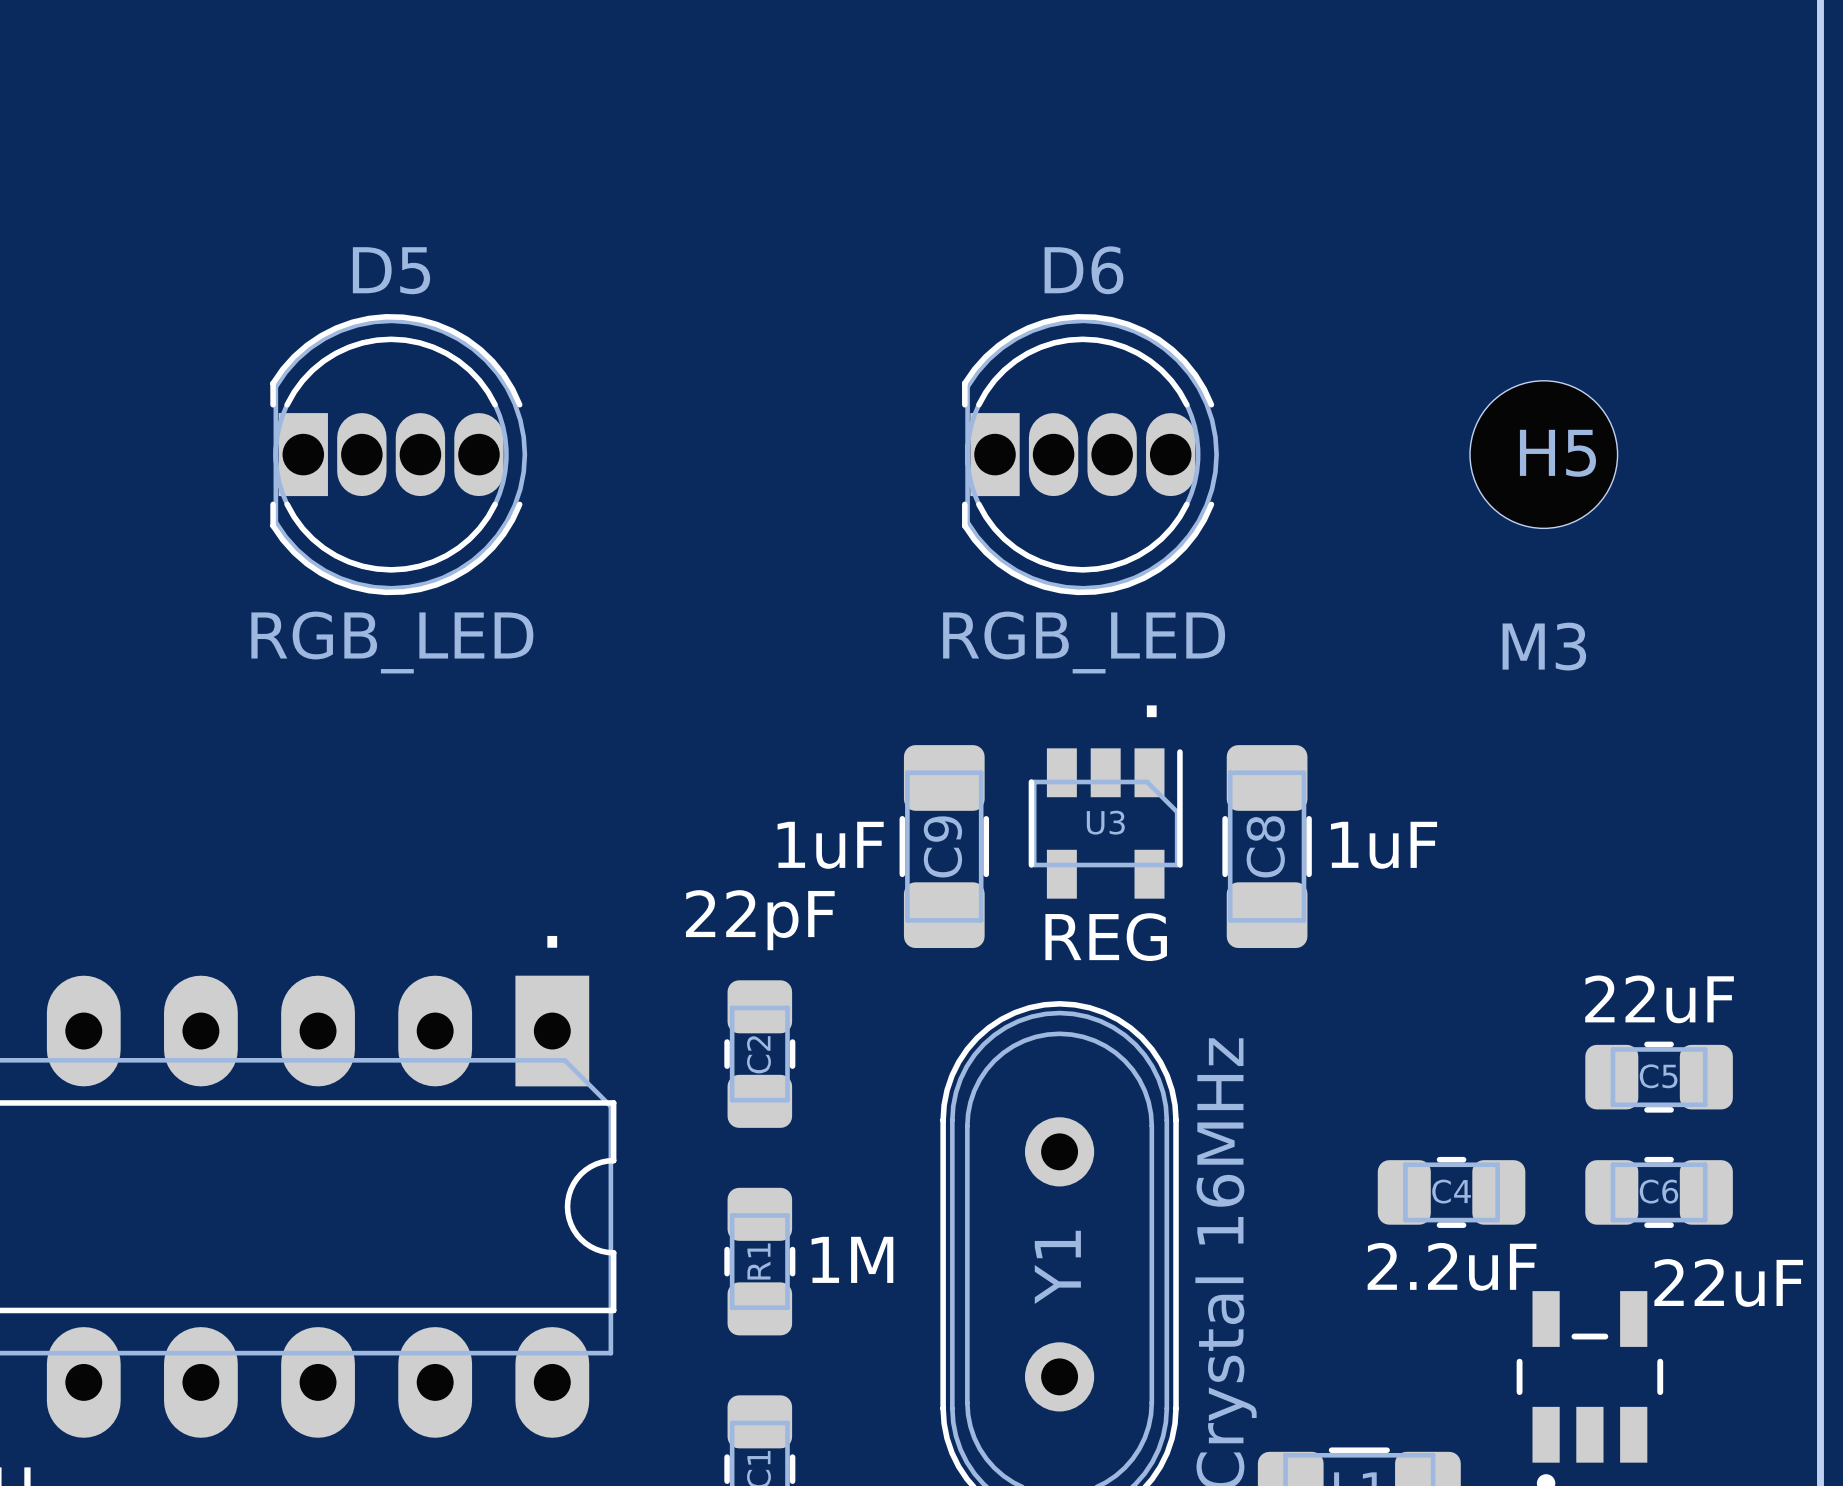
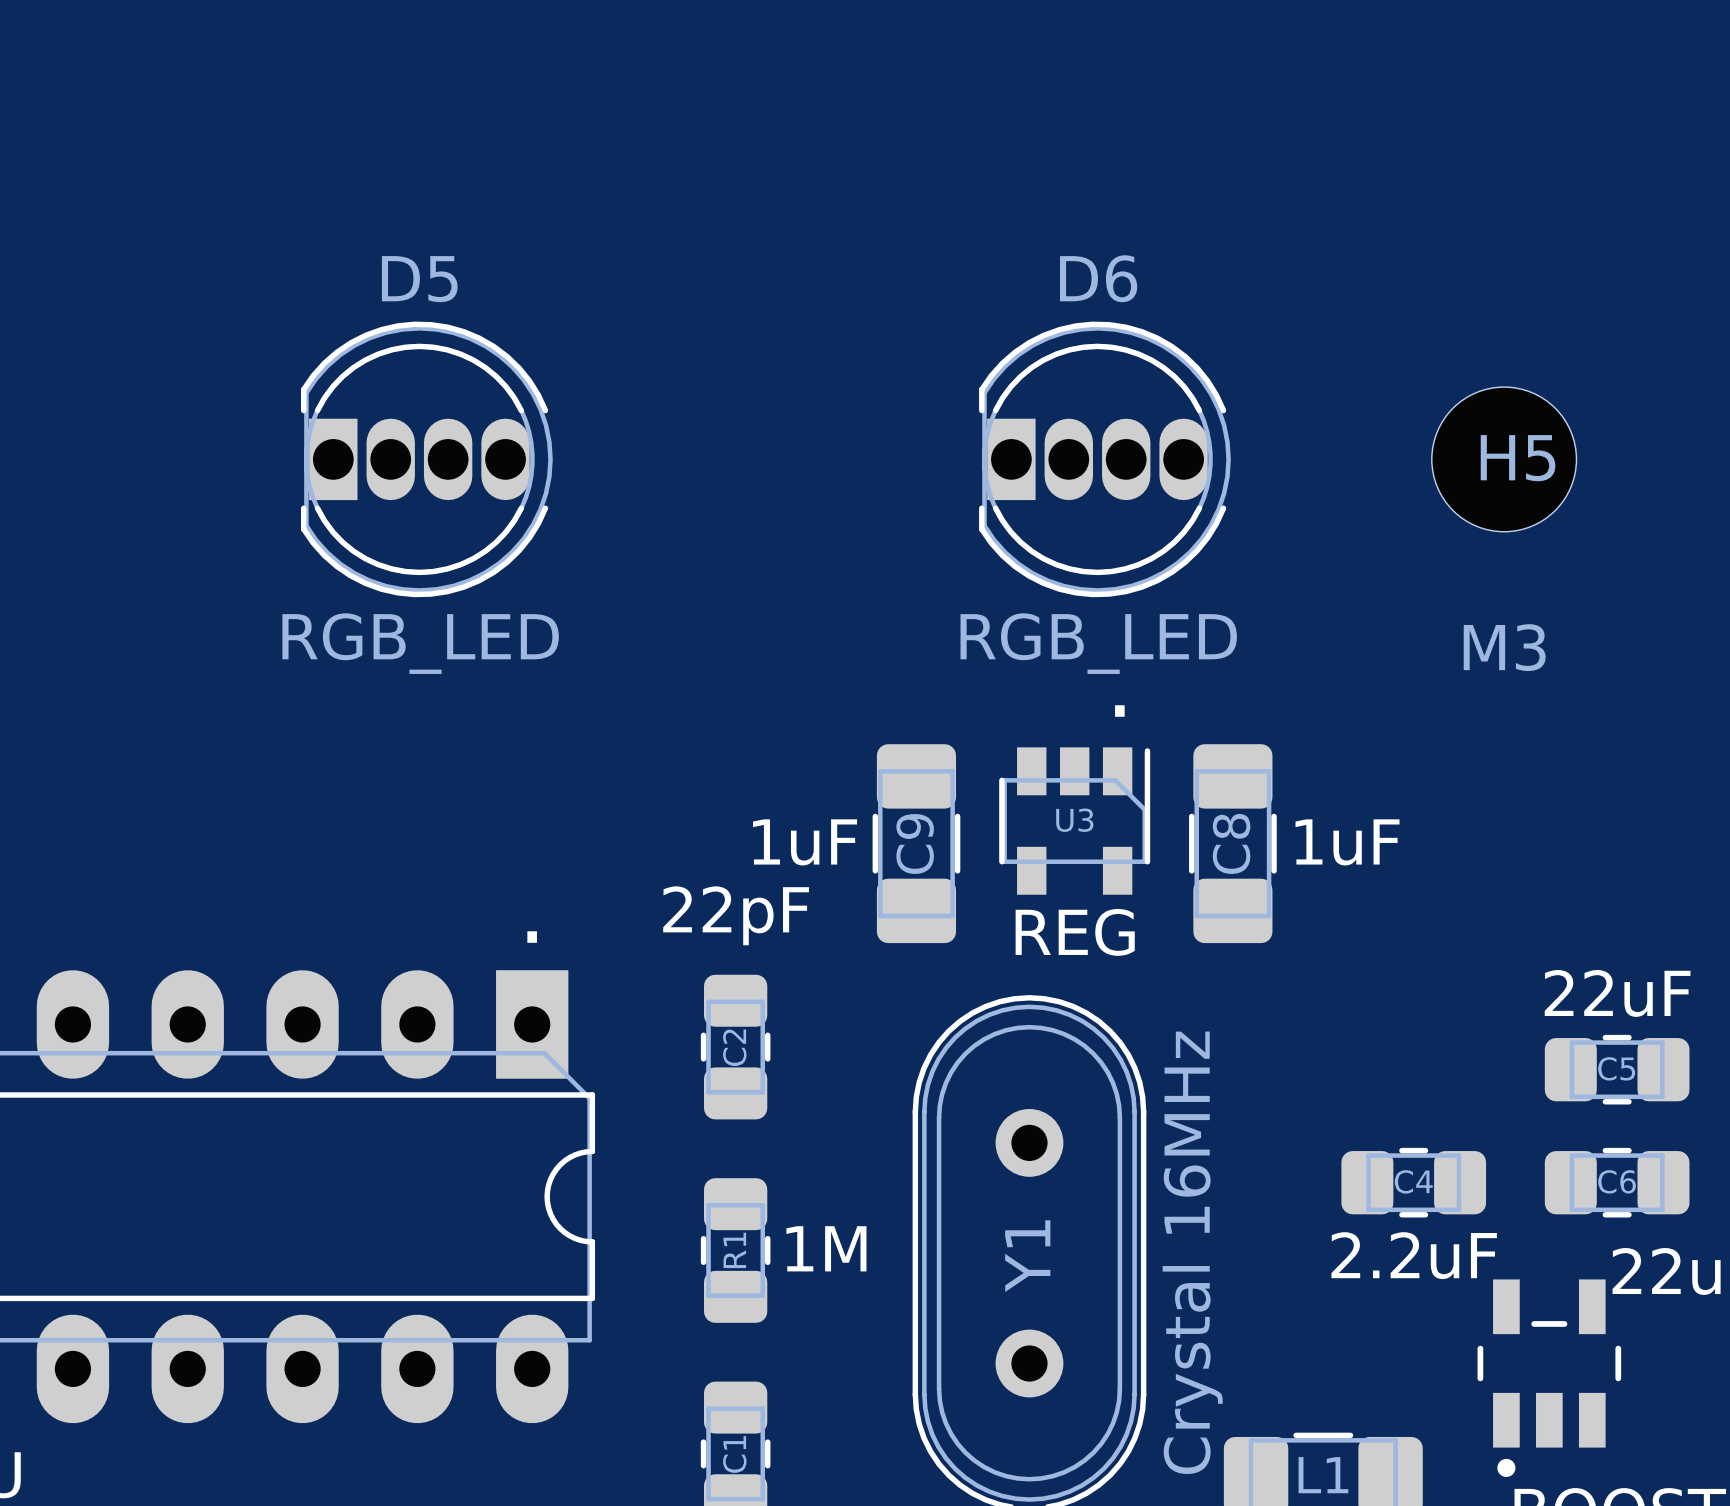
D5 position: (398, 454) -> (426, 459)
D6 position: (1090, 454) -> (1104, 459)

